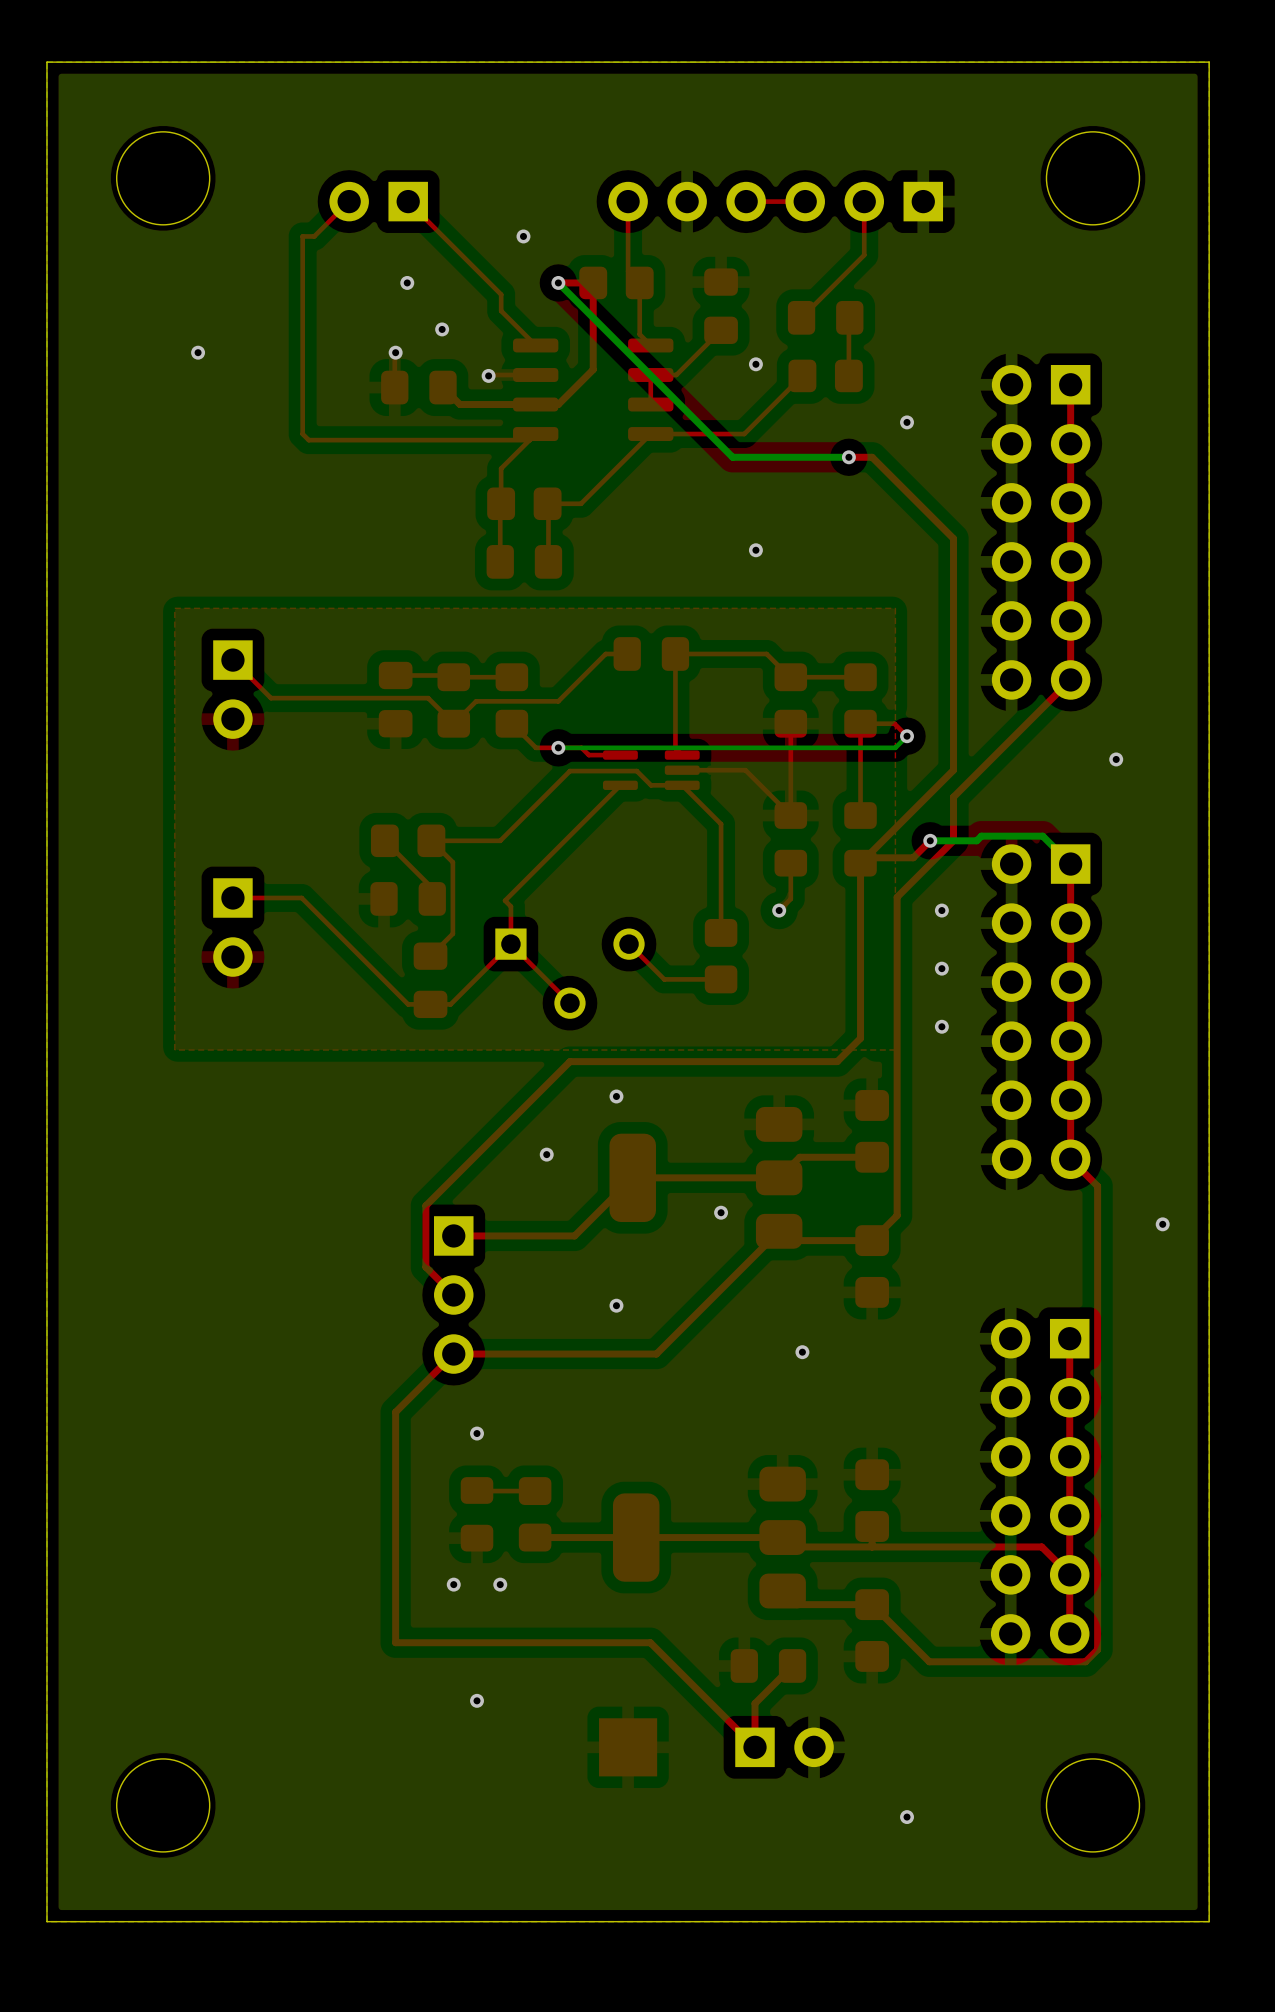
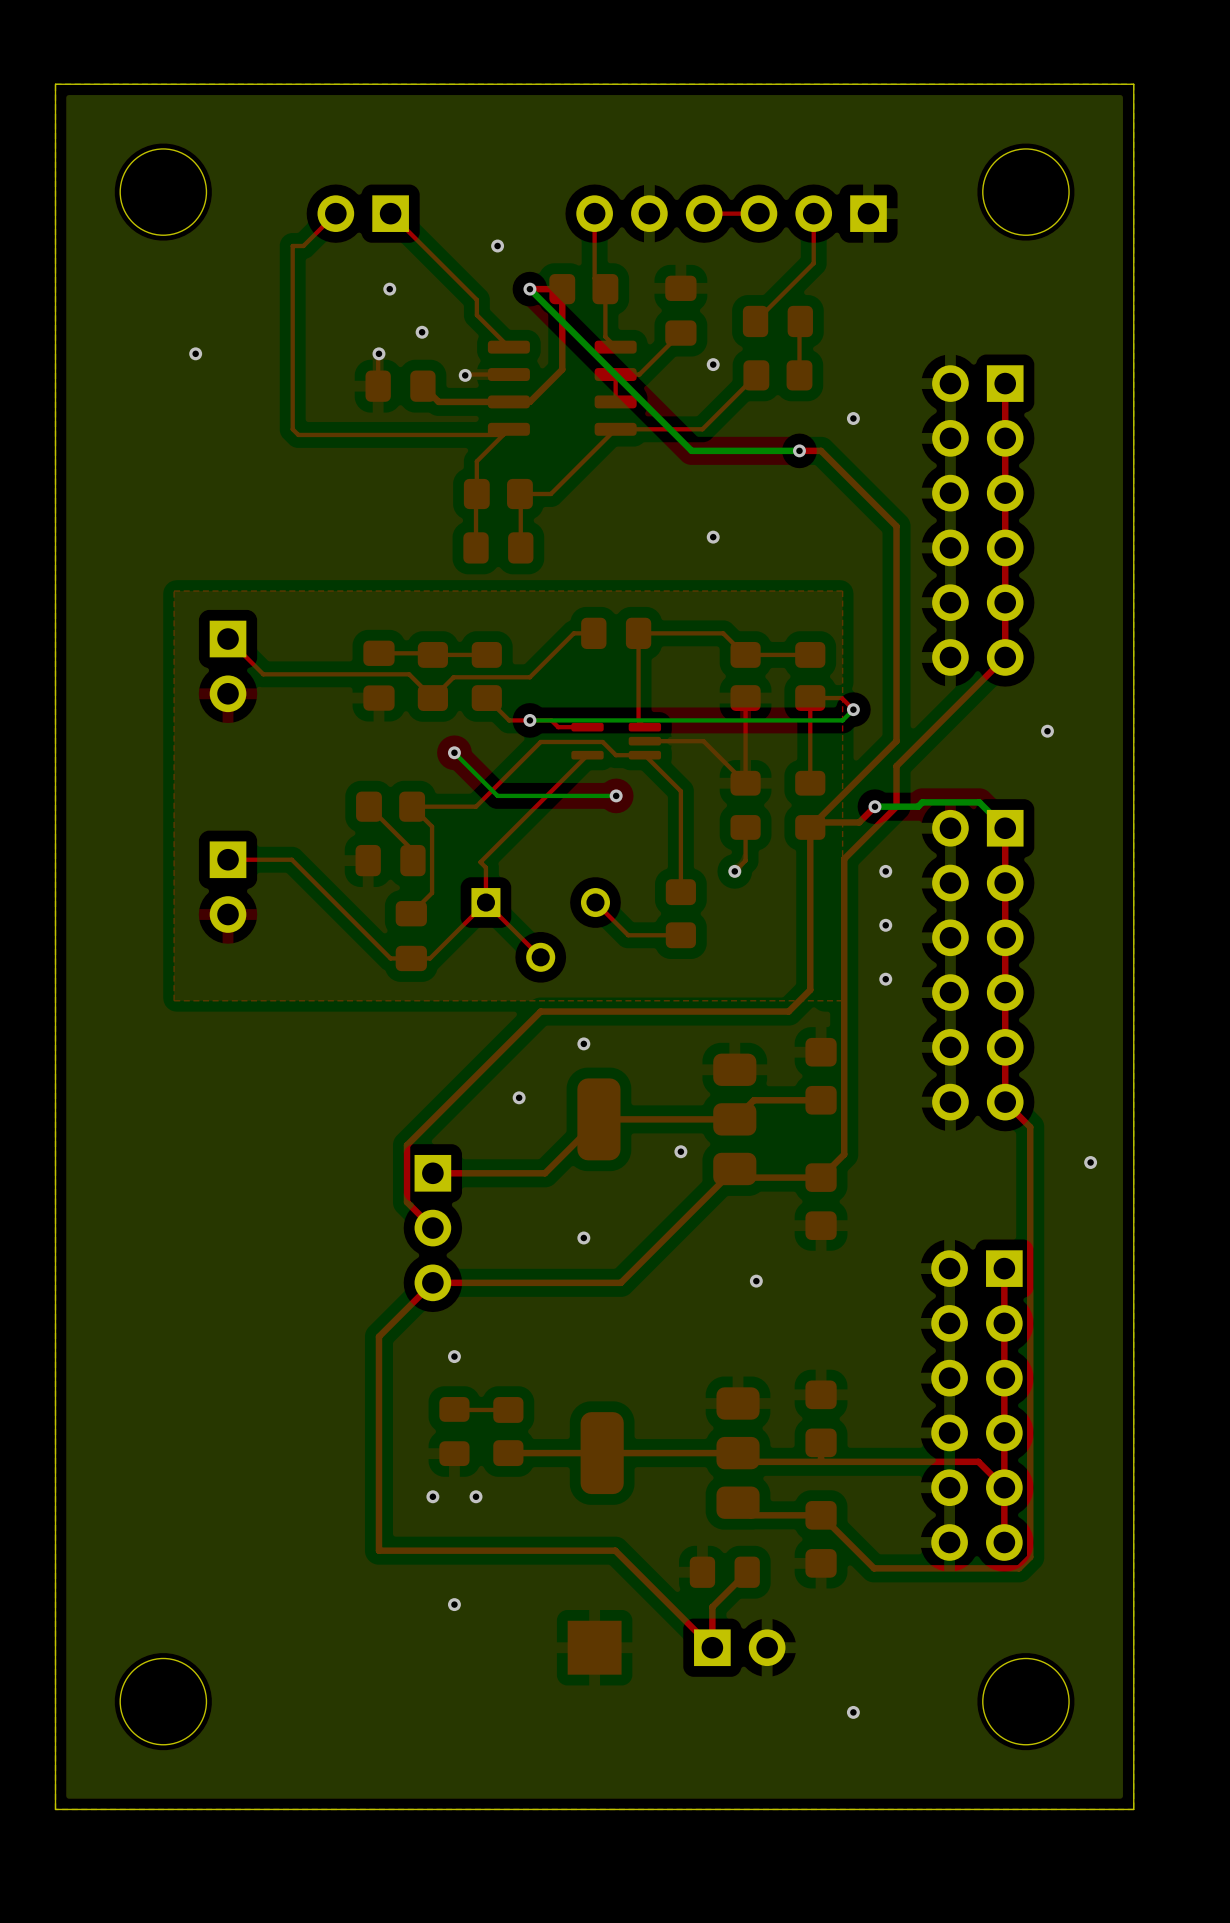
bottom track: none -> (454, 752) (497, 795) (616, 795)
via: none -> (454, 752)
via: none -> (616, 795)

